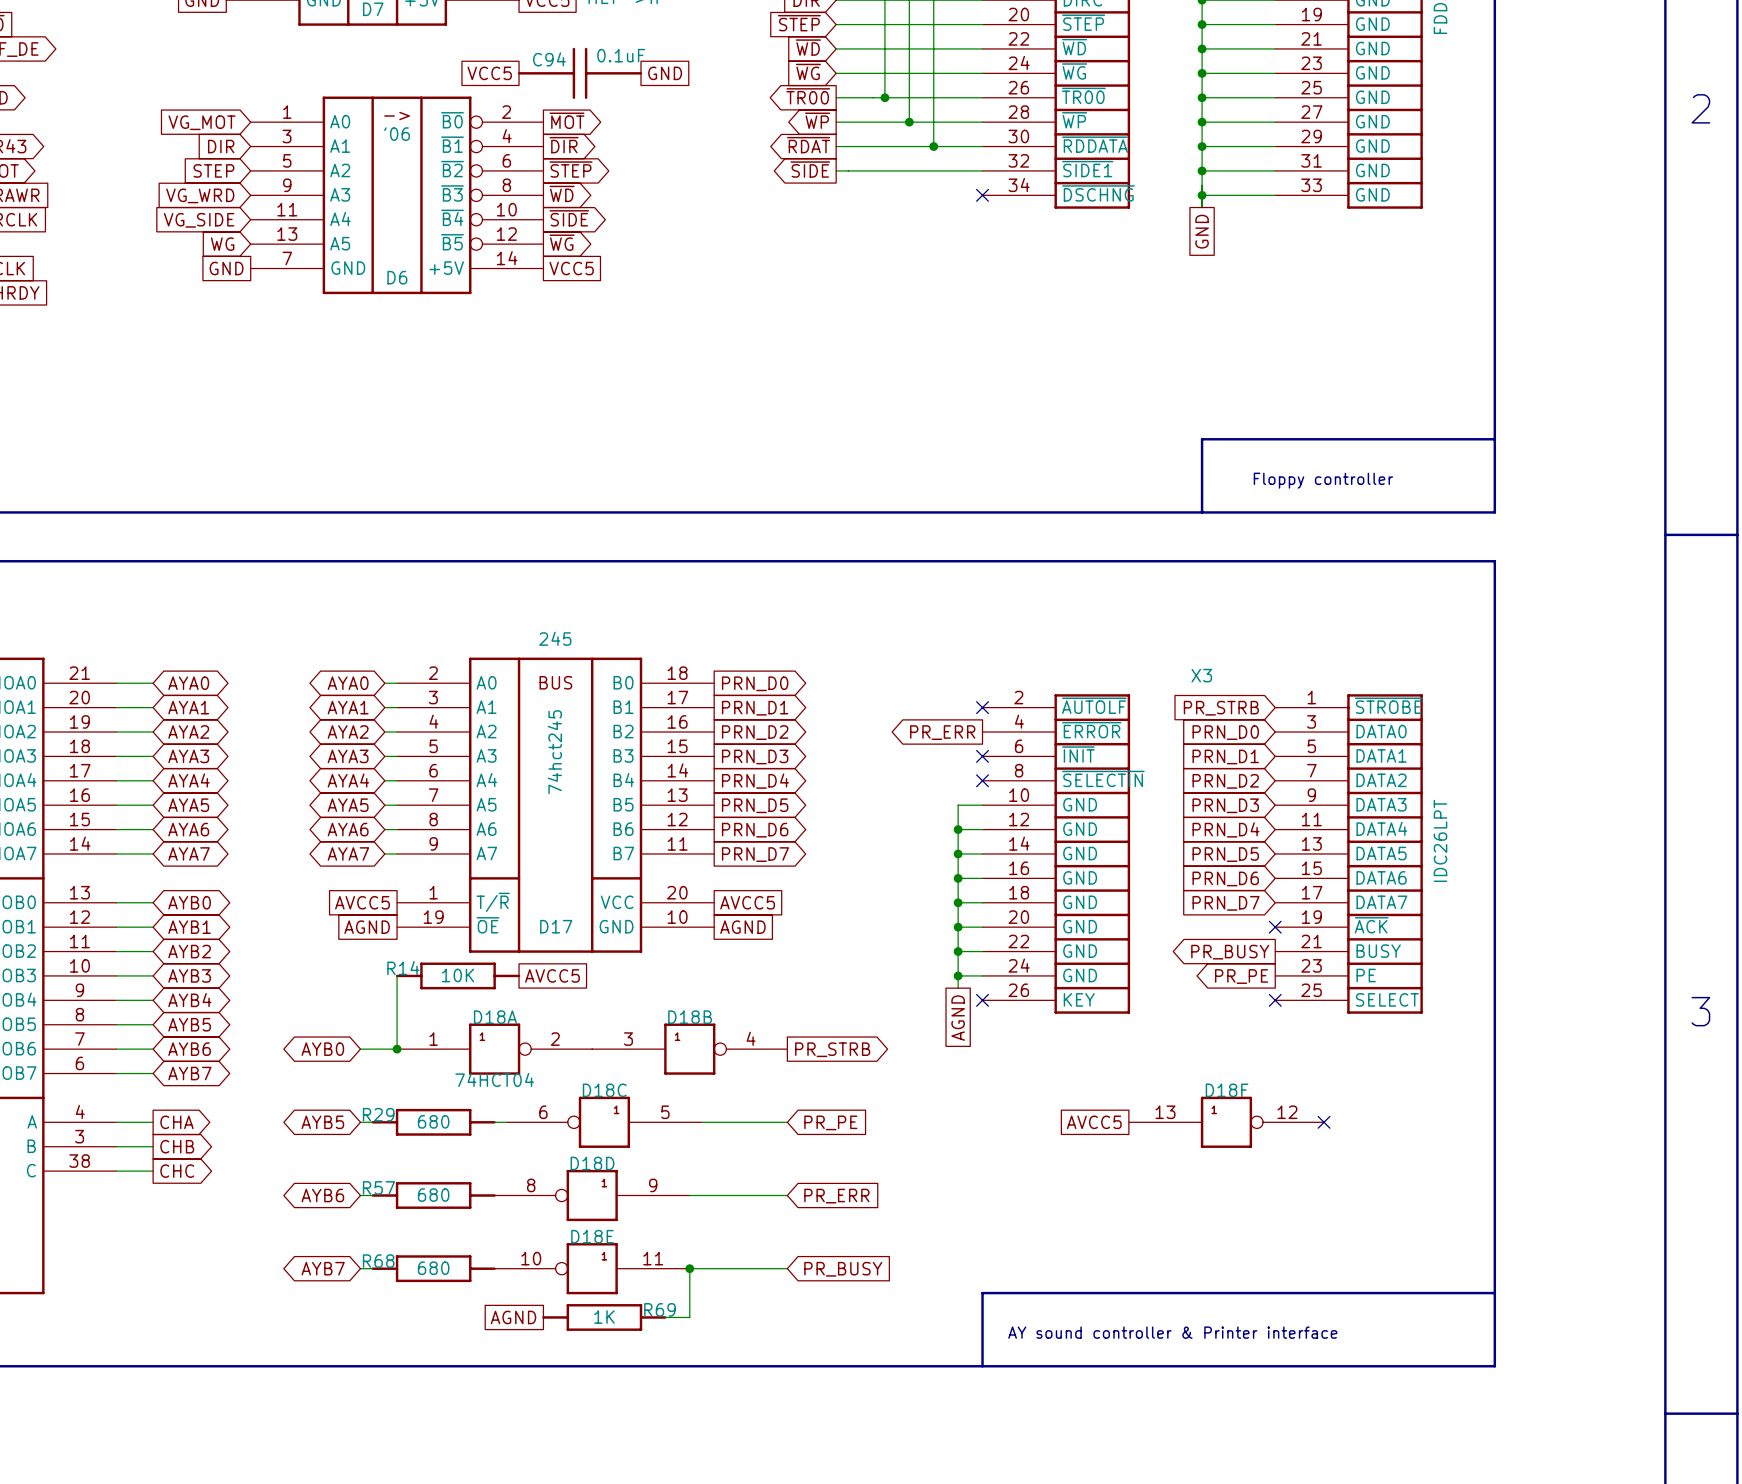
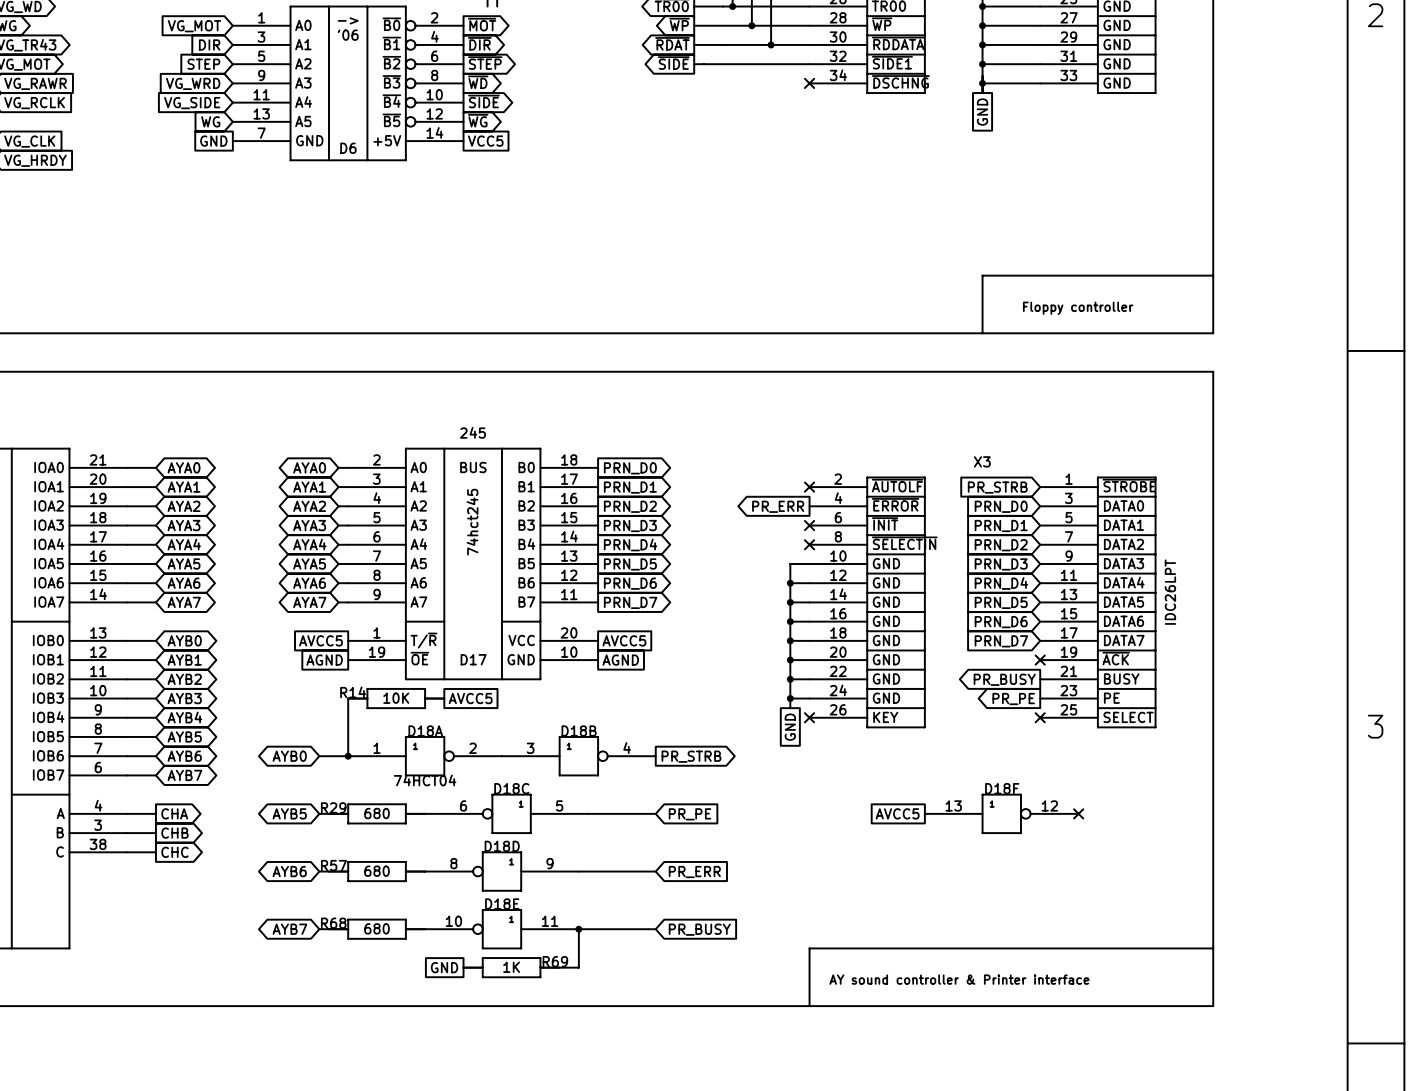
global label: AGND (958, 1018) -> GND (790, 727)
global label: AGND (513, 1317) -> GND (444, 967)

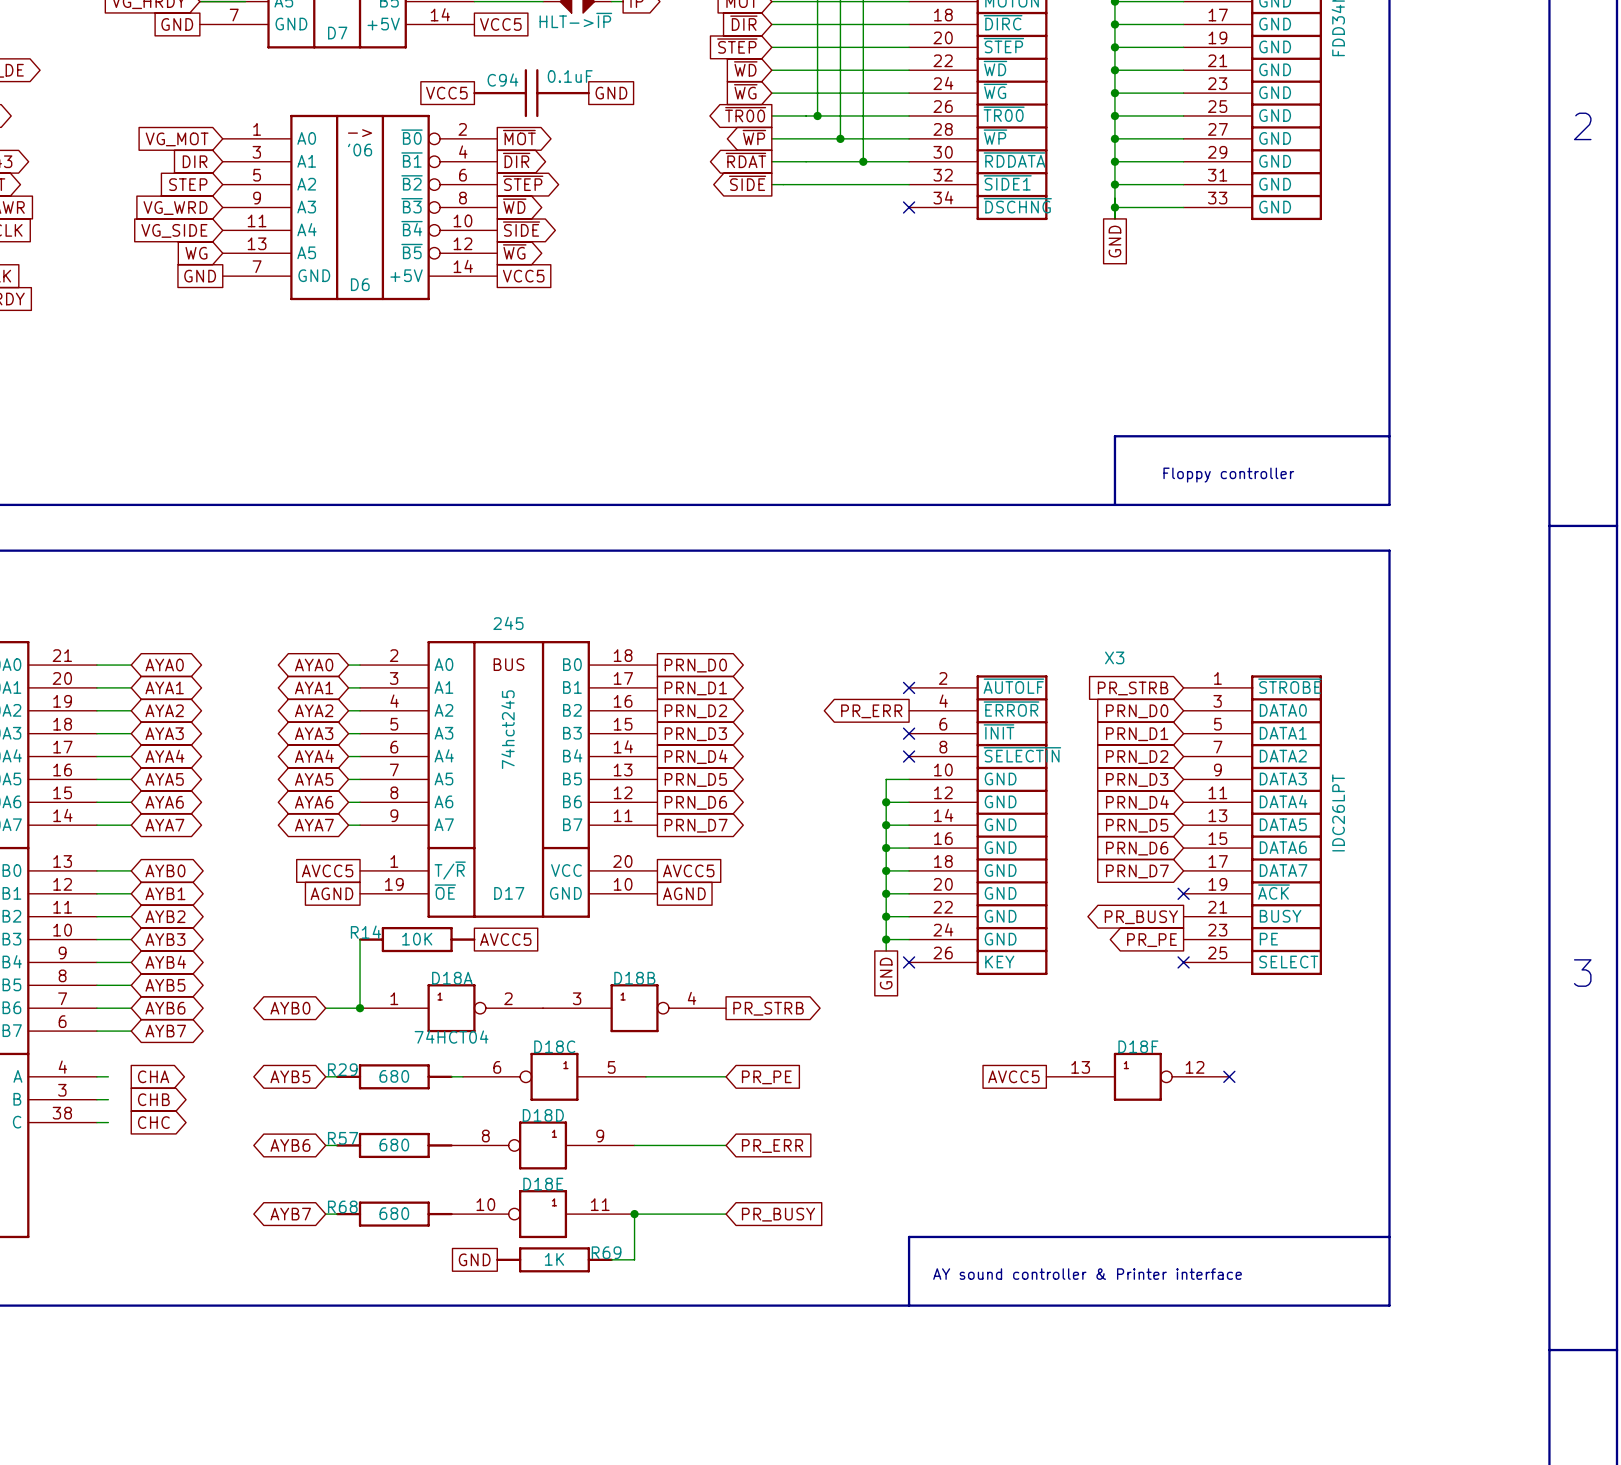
wire: (136, 813) (155, 813) -> none
wire: (136, 833) (155, 833) -> none
wire: (136, 852) (155, 852) -> none

